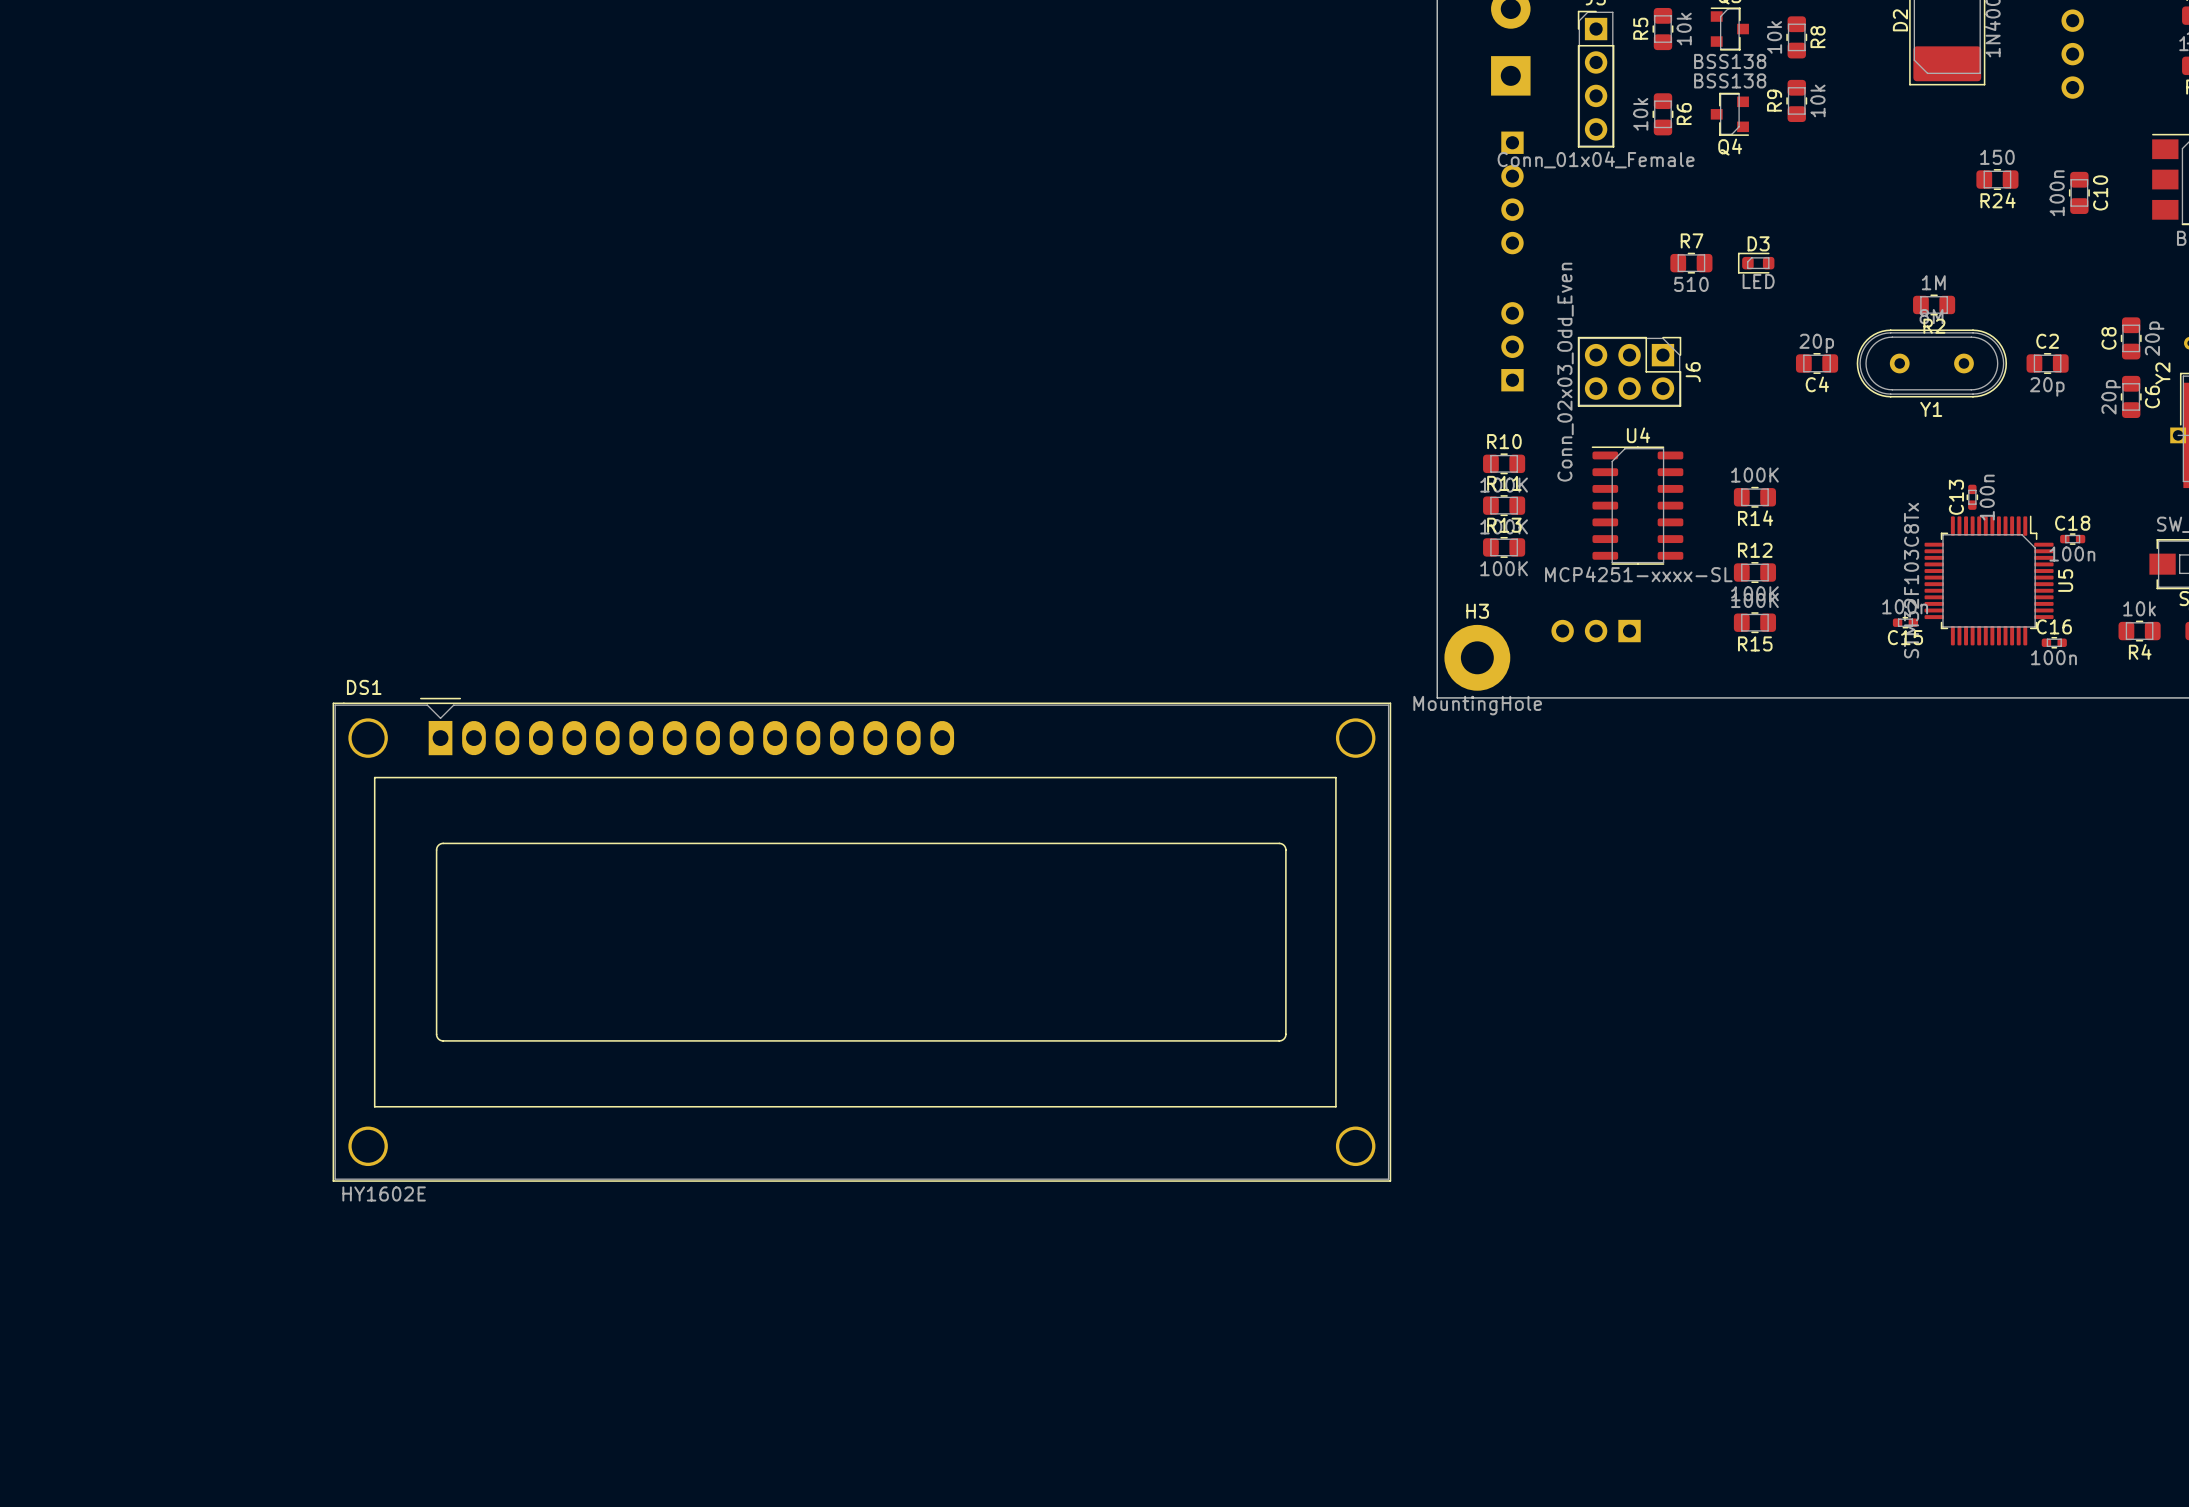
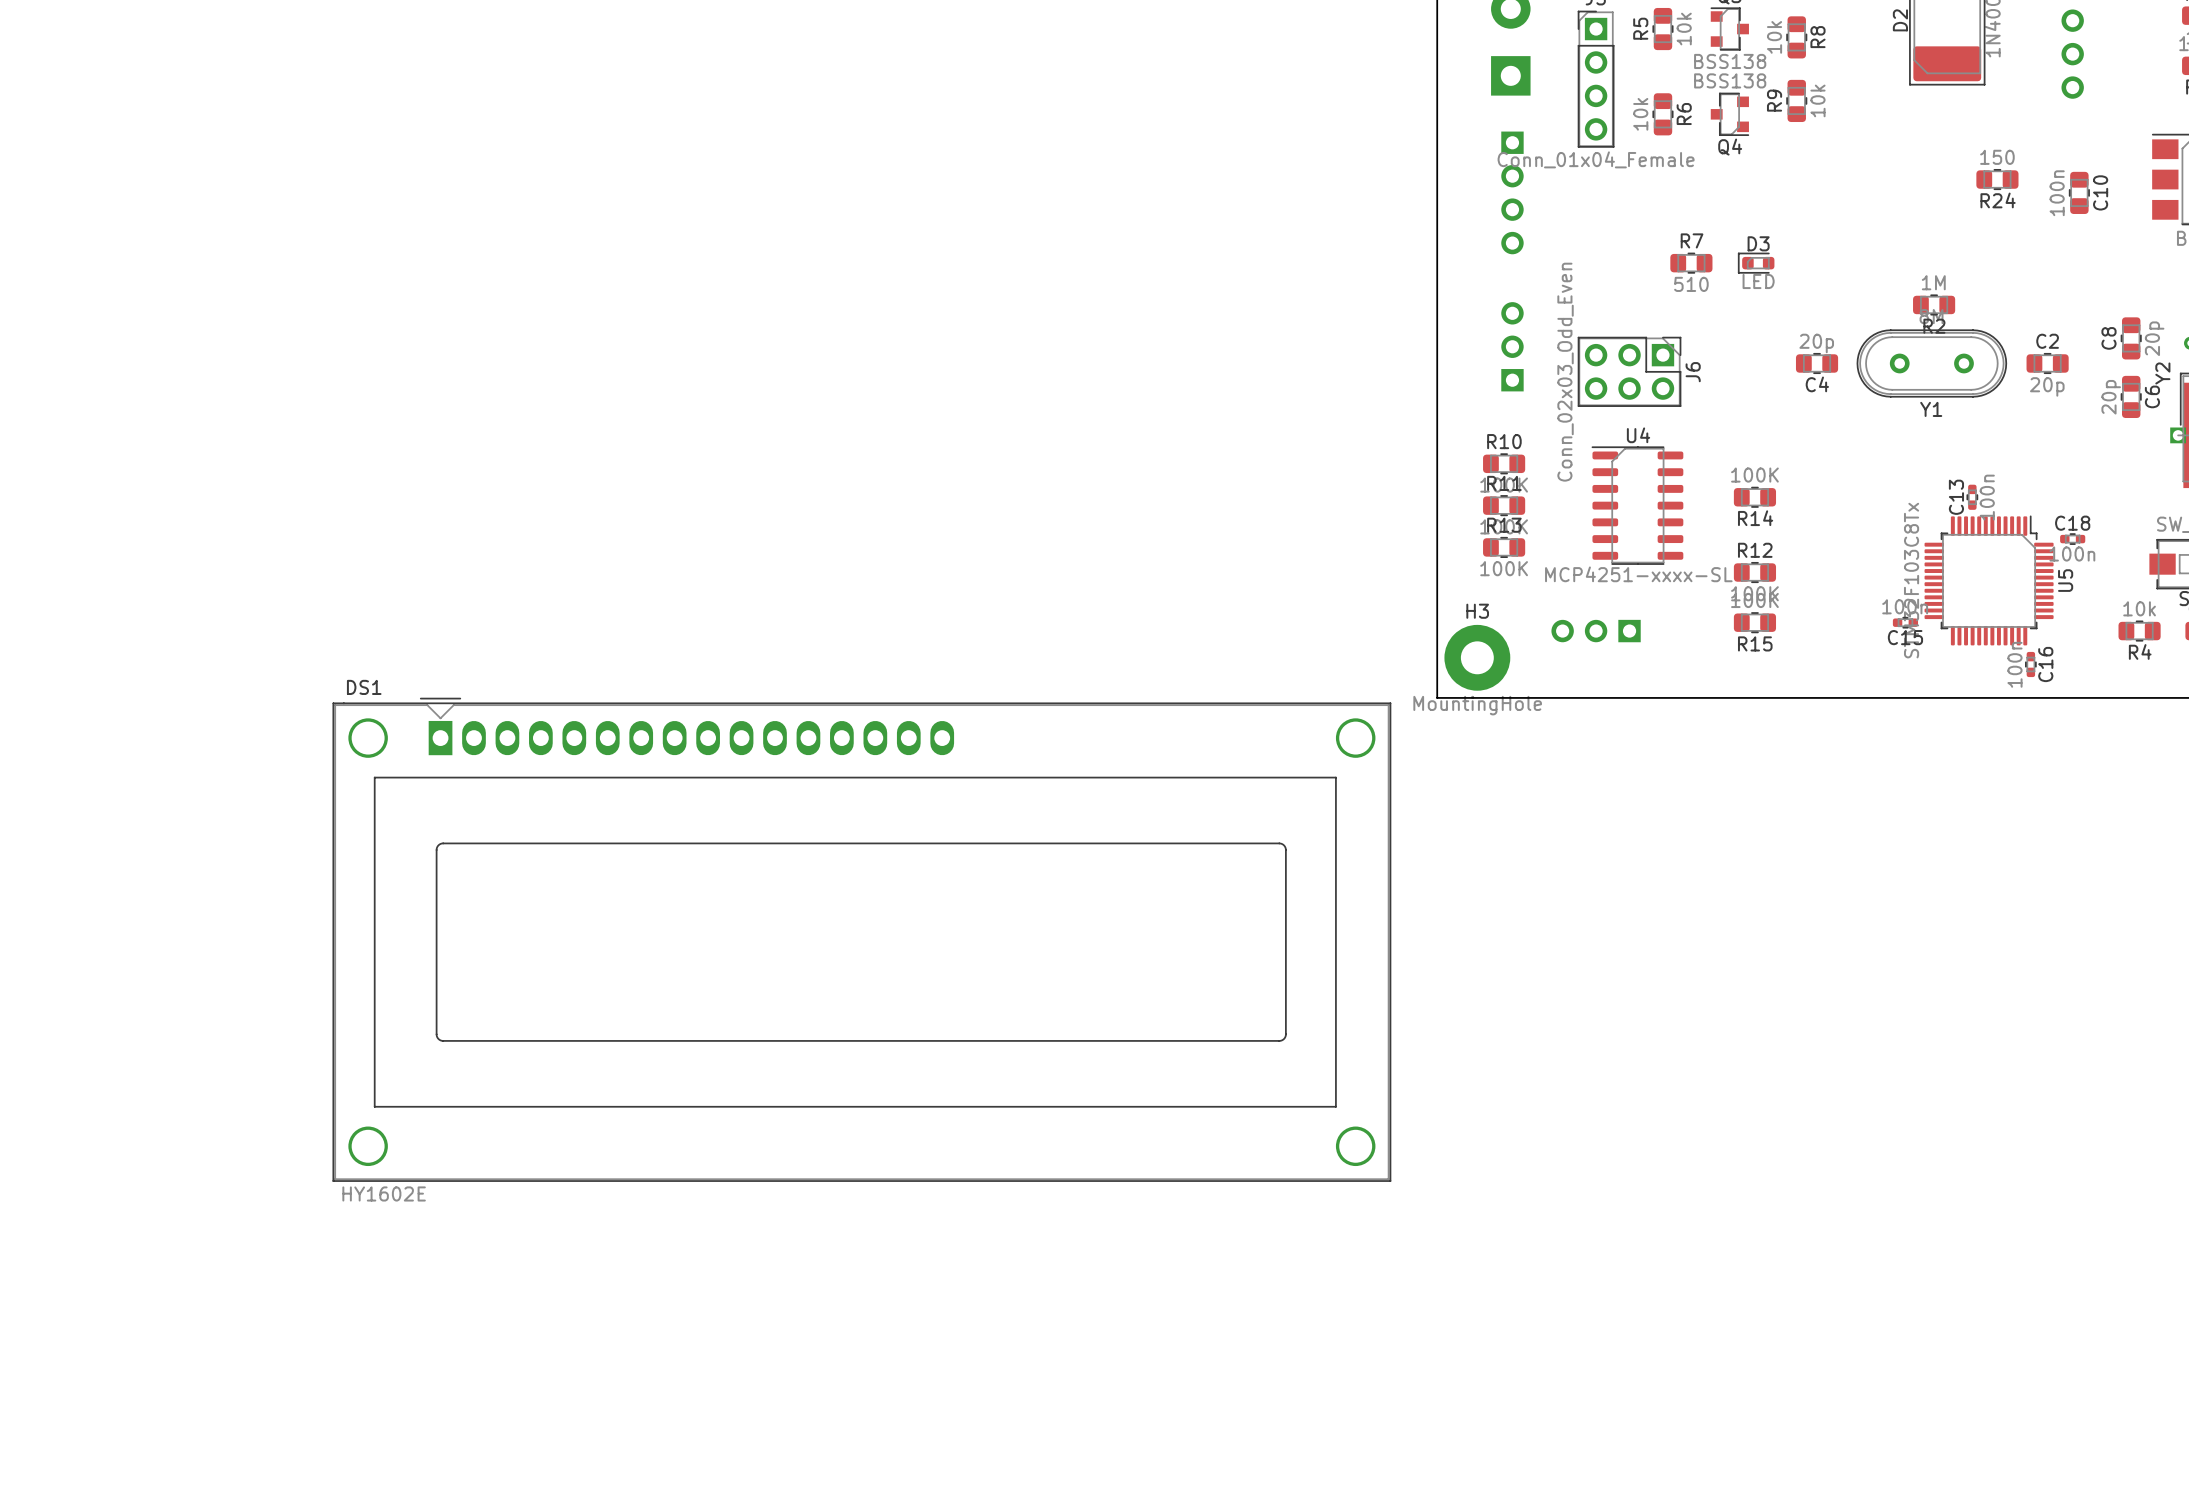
C16 rotation: 0° (2054, 642) -> 90° clockwise (2030, 664)
C16 position: (2054, 642) -> (2030, 664)

